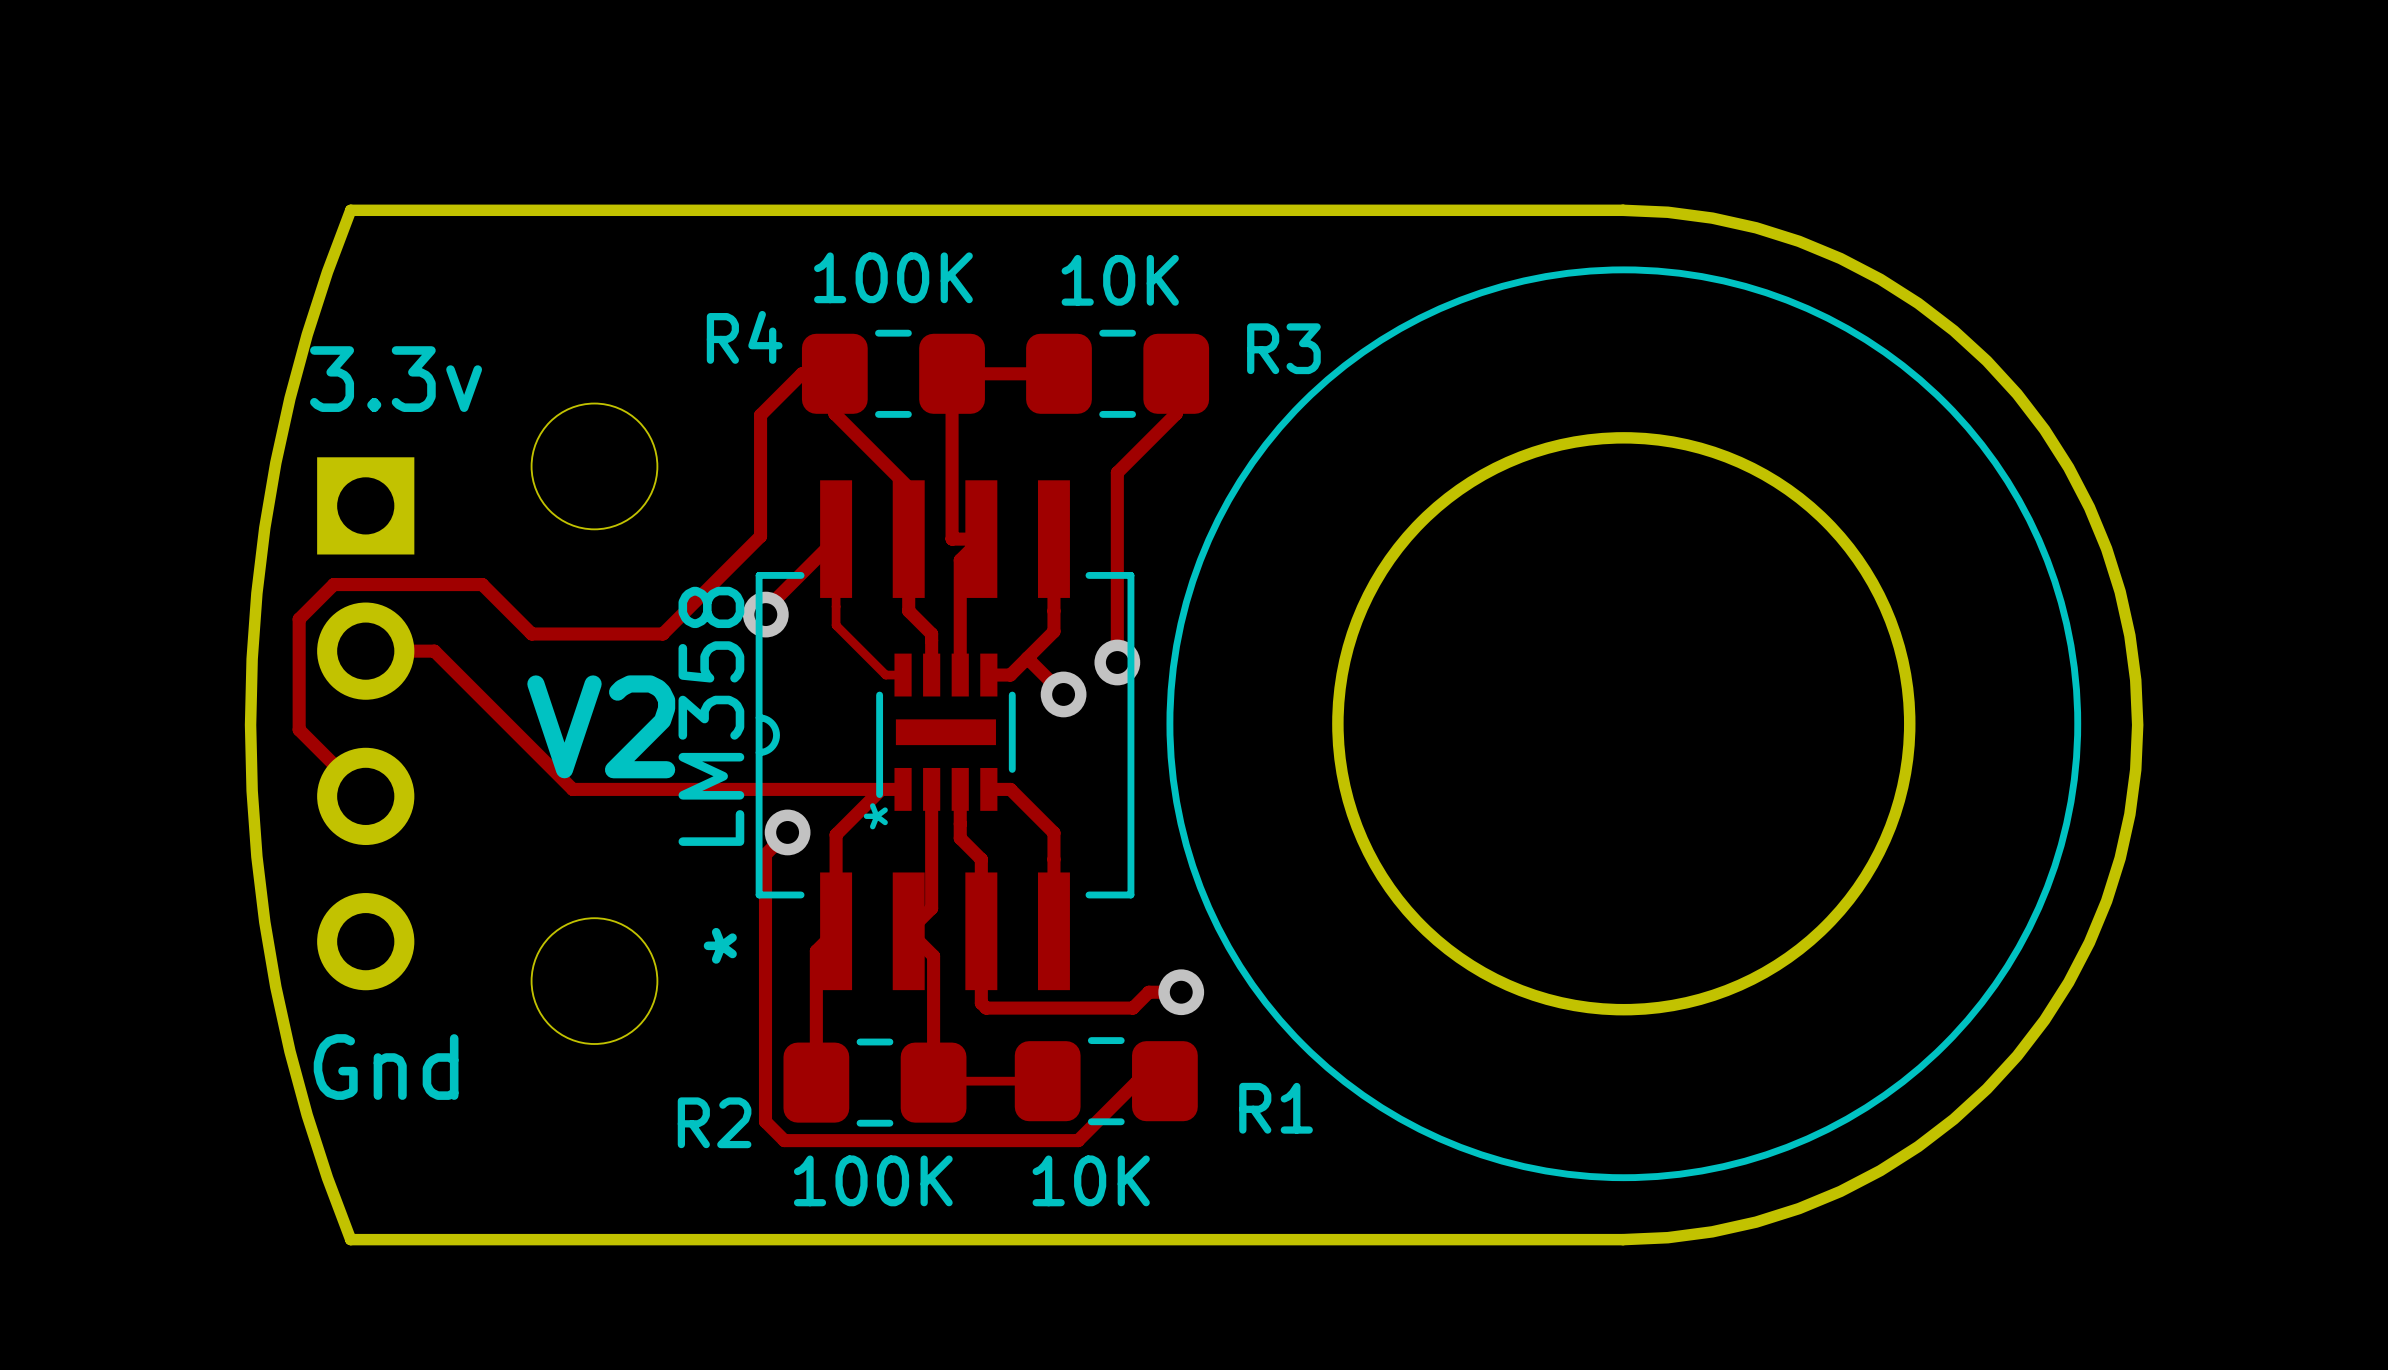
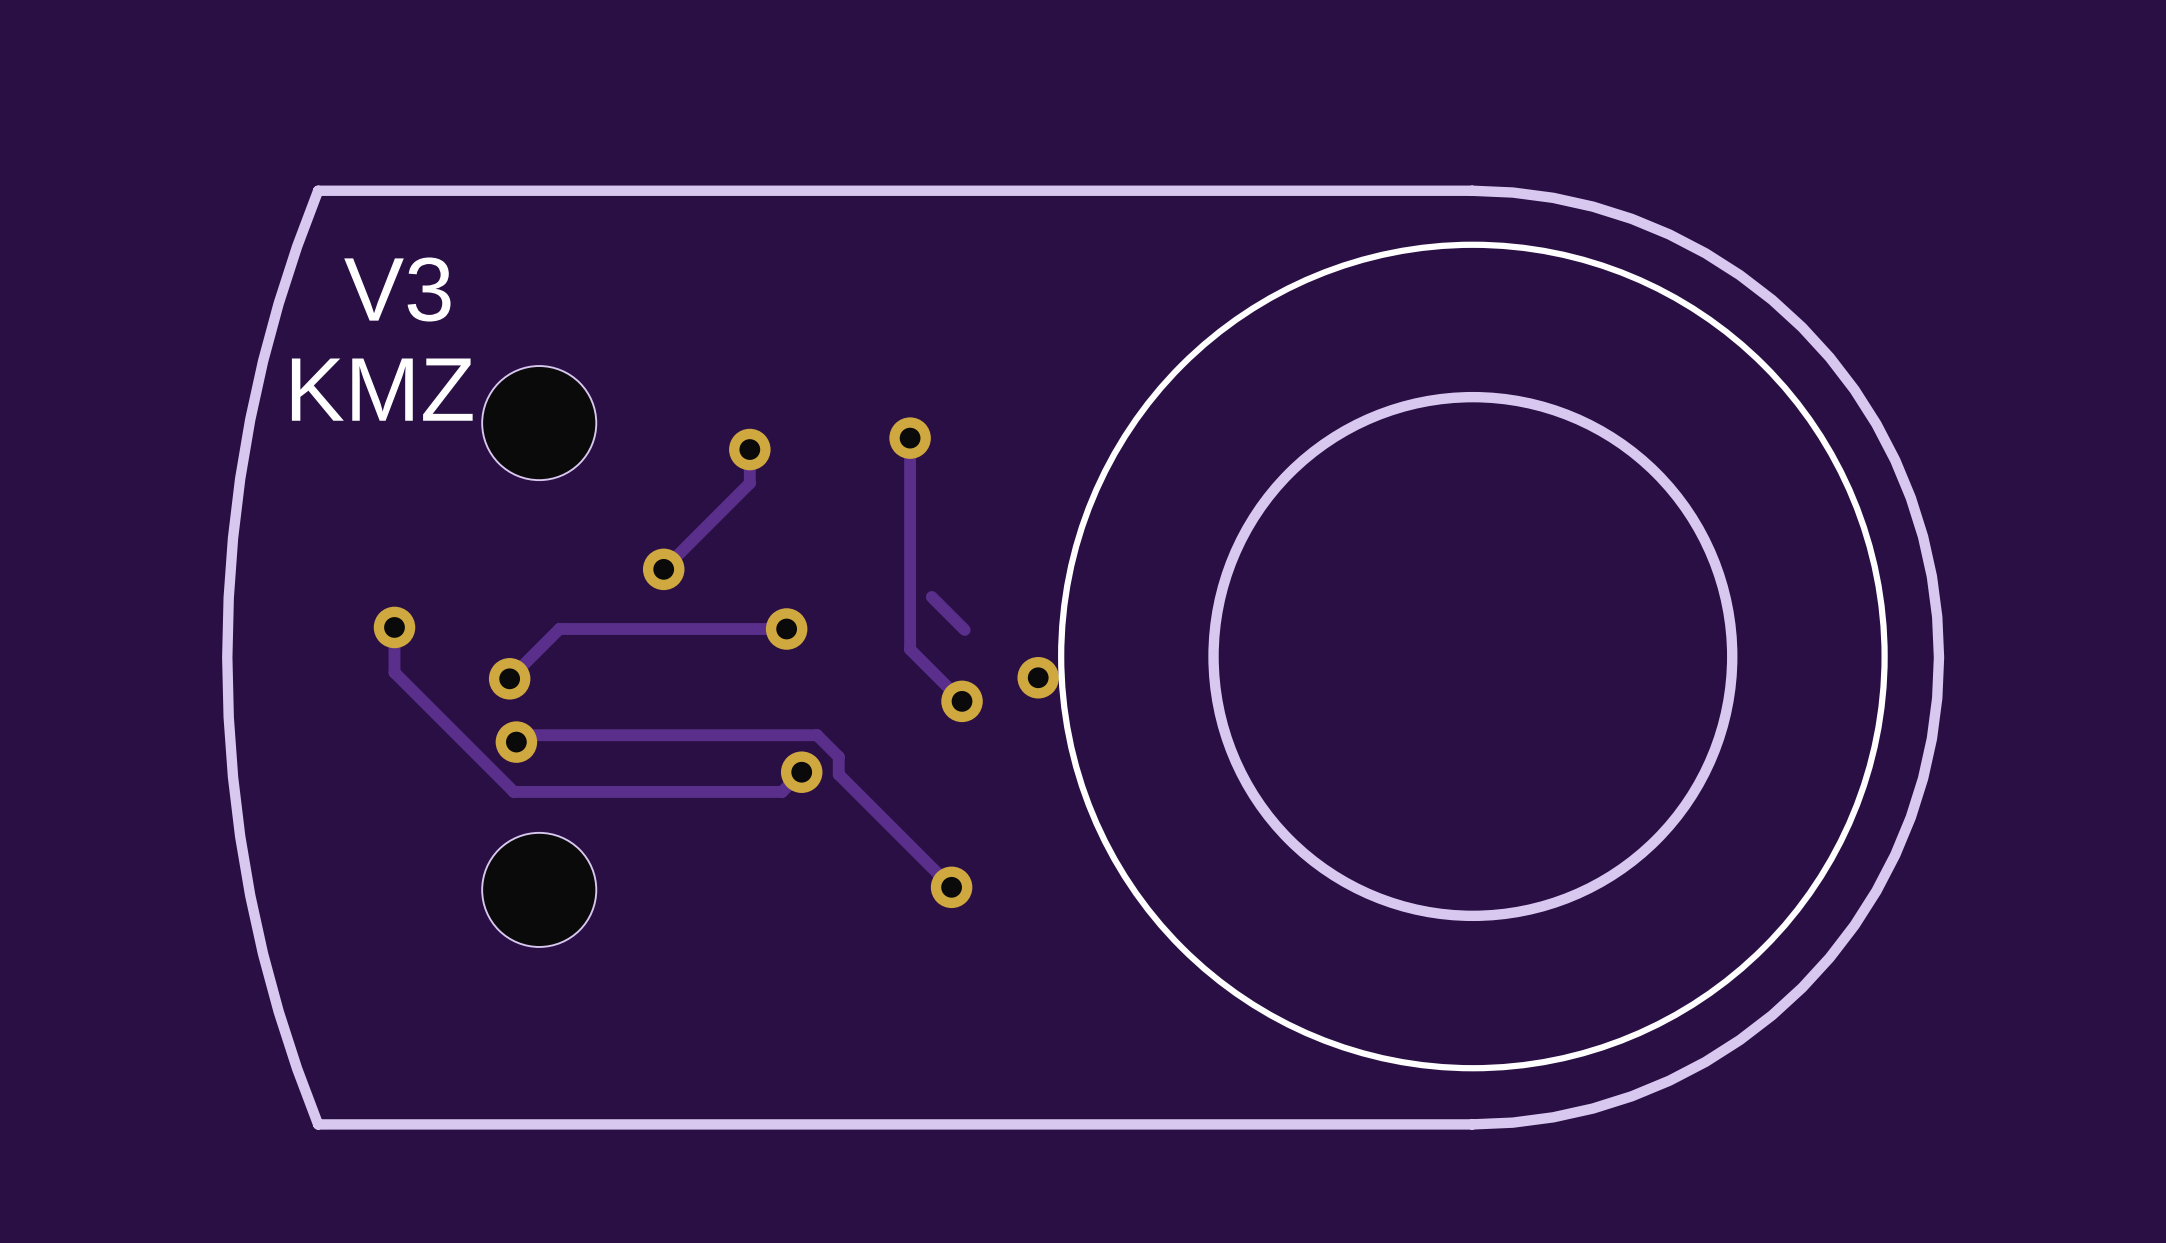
text: none -> V3 (397, 289)
R4: 100K (893, 373) -> none
track: (1059, 373) (952, 373) (952, 538) -> none
R3: 10K (1117, 373) -> none
track: (1176, 373) (1176, 413) (1117, 472) (1117, 662) -> none
text: 3.3v (396, 379) -> none
text: none -> KMZ (382, 389)
track: none -> (910, 438) (910, 649) (962, 701)
via: none -> (910, 438)
track: none -> (749, 449) (749, 483) (663, 569)
via: none -> (749, 449)
track: (952, 539) (981, 539) (960, 560) (960, 675) -> none
track: (1053, 539) (1053, 631) (1010, 675) (988, 675) -> none
track: (765, 614) (765, 609) (836, 539) (836, 625) (885, 675) (903, 675) -> none
via position: (765, 614) -> (663, 569)
track: (365, 651) (434, 651) (572, 789) (903, 789) -> none
via: (1117, 662) -> none
track: (931, 675) (931, 633) (908, 611) (908, 487) (834, 413) (834, 373) (801, 373) (760, 415) (760, 536) (662, 634) (531, 634) (482, 584) (333, 584) (299, 619) (299, 729) (365, 796) -> none
track: none -> (394, 627) (394, 672) (513, 791) (782, 791) (801, 772)
via: none -> (394, 627)
track: none -> (786, 629) (559, 629) (509, 678)
via: none -> (786, 629)
via: (1063, 694) -> none
part: (365, 723) -> none
text: V2 (601, 726) -> none
part: (945, 732) -> none
part: LM358 (945, 735) -> none
via: none -> (1038, 677)
via: none -> (509, 678)
via: none -> (962, 701)
track: (881, 789) (836, 834) (836, 931) (816, 951) (816, 1082) -> none
track: (931, 789) (931, 908) (908, 931) (933, 956) (933, 1082) (1047, 1081) -> none
track: (960, 789) (960, 838) (981, 859) (981, 1003) (986, 1008) (1133, 1008) (1148, 992) (1181, 992) -> none
track: (988, 789) (1010, 789) (1053, 832) (1053, 931) -> none
track: none -> (516, 742) (523, 735) (817, 735) (838, 756) (838, 774) (951, 887)
via: none -> (516, 742)
track: (787, 832) (765, 854) (765, 1121) (784, 1140) (1078, 1140) (1137, 1081) (1164, 1081) -> none
via: (787, 832) -> none
via: none -> (801, 772)
via: none -> (951, 887)
via: (1181, 992) -> none
text: Gnd (386, 1067) -> none
R1: 10K (1106, 1081) -> none
R2: 100K (874, 1082) -> none

